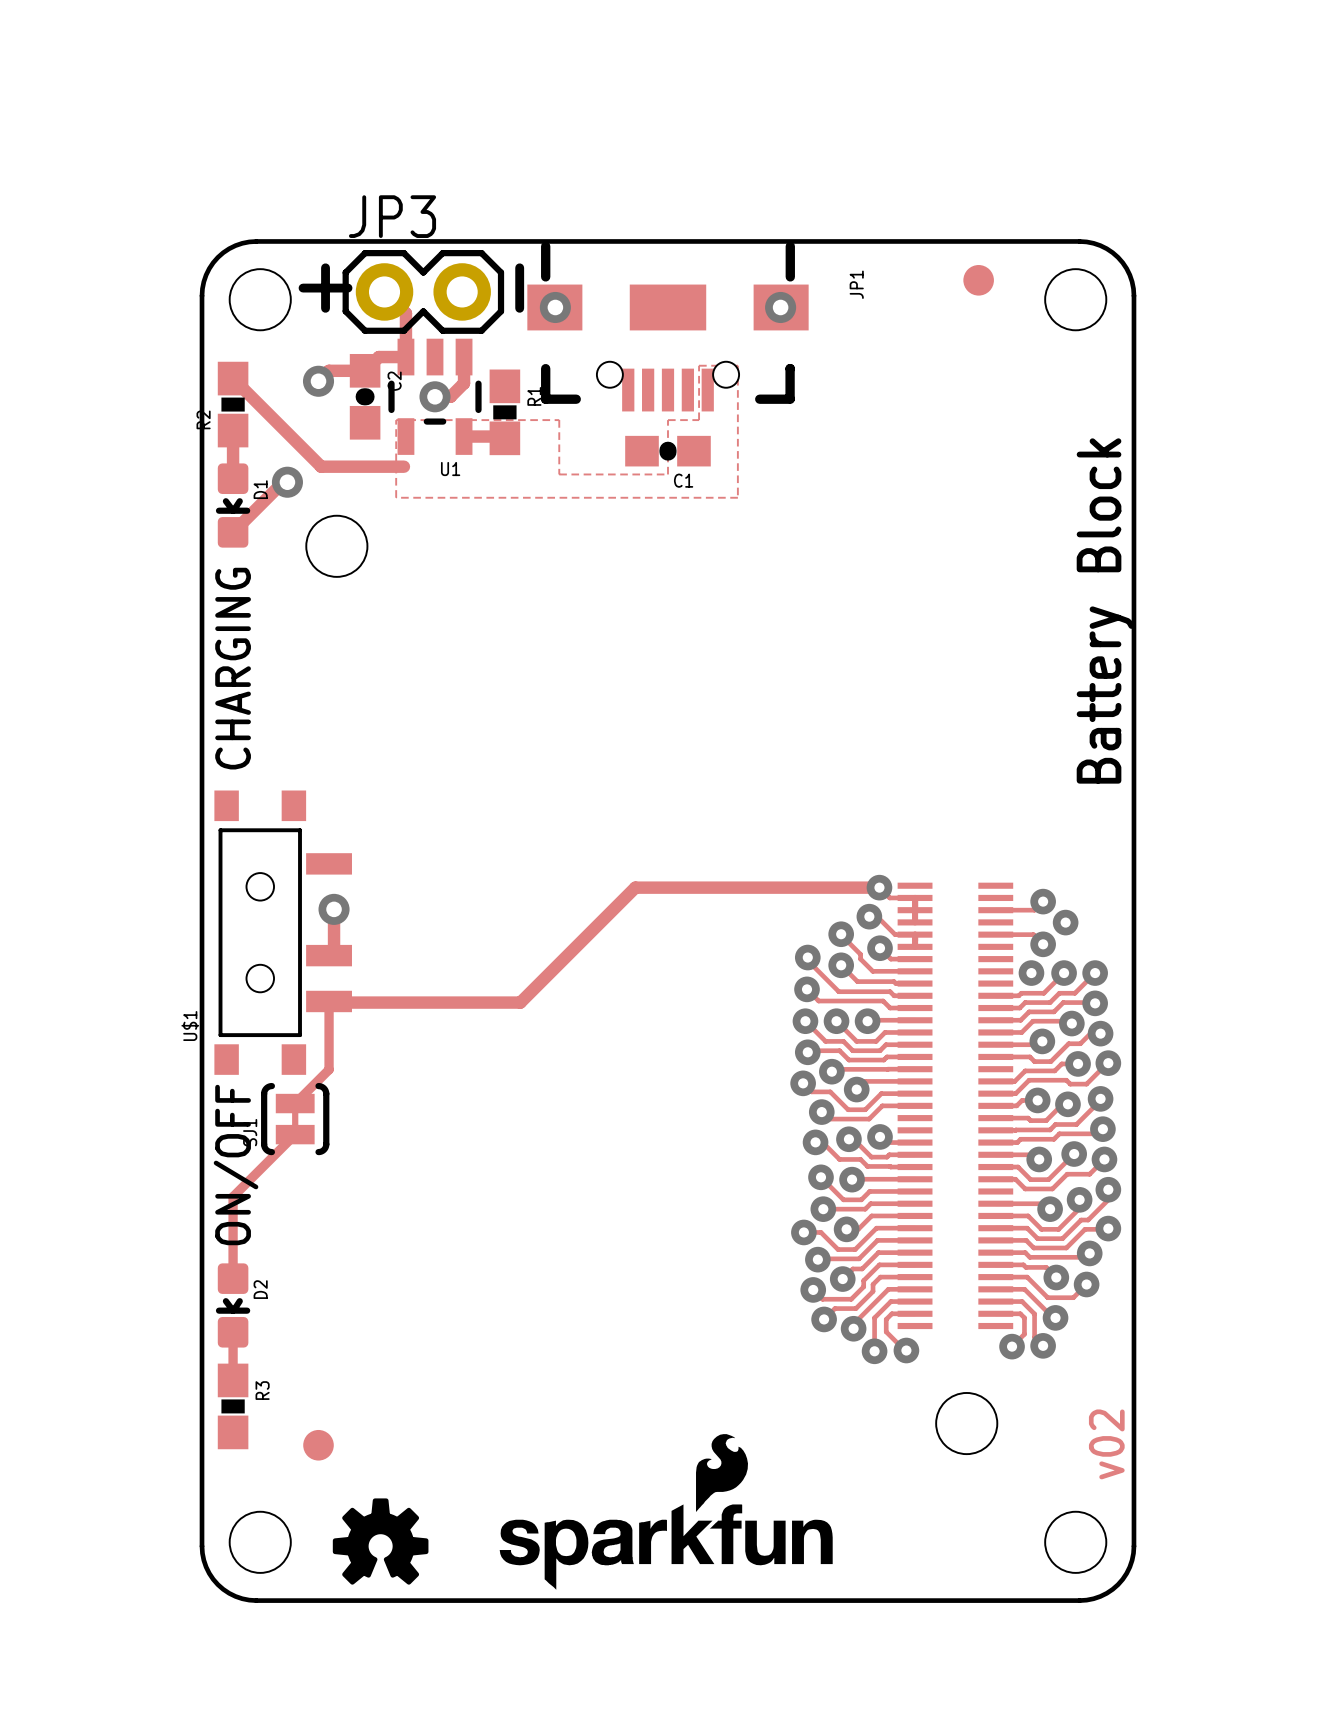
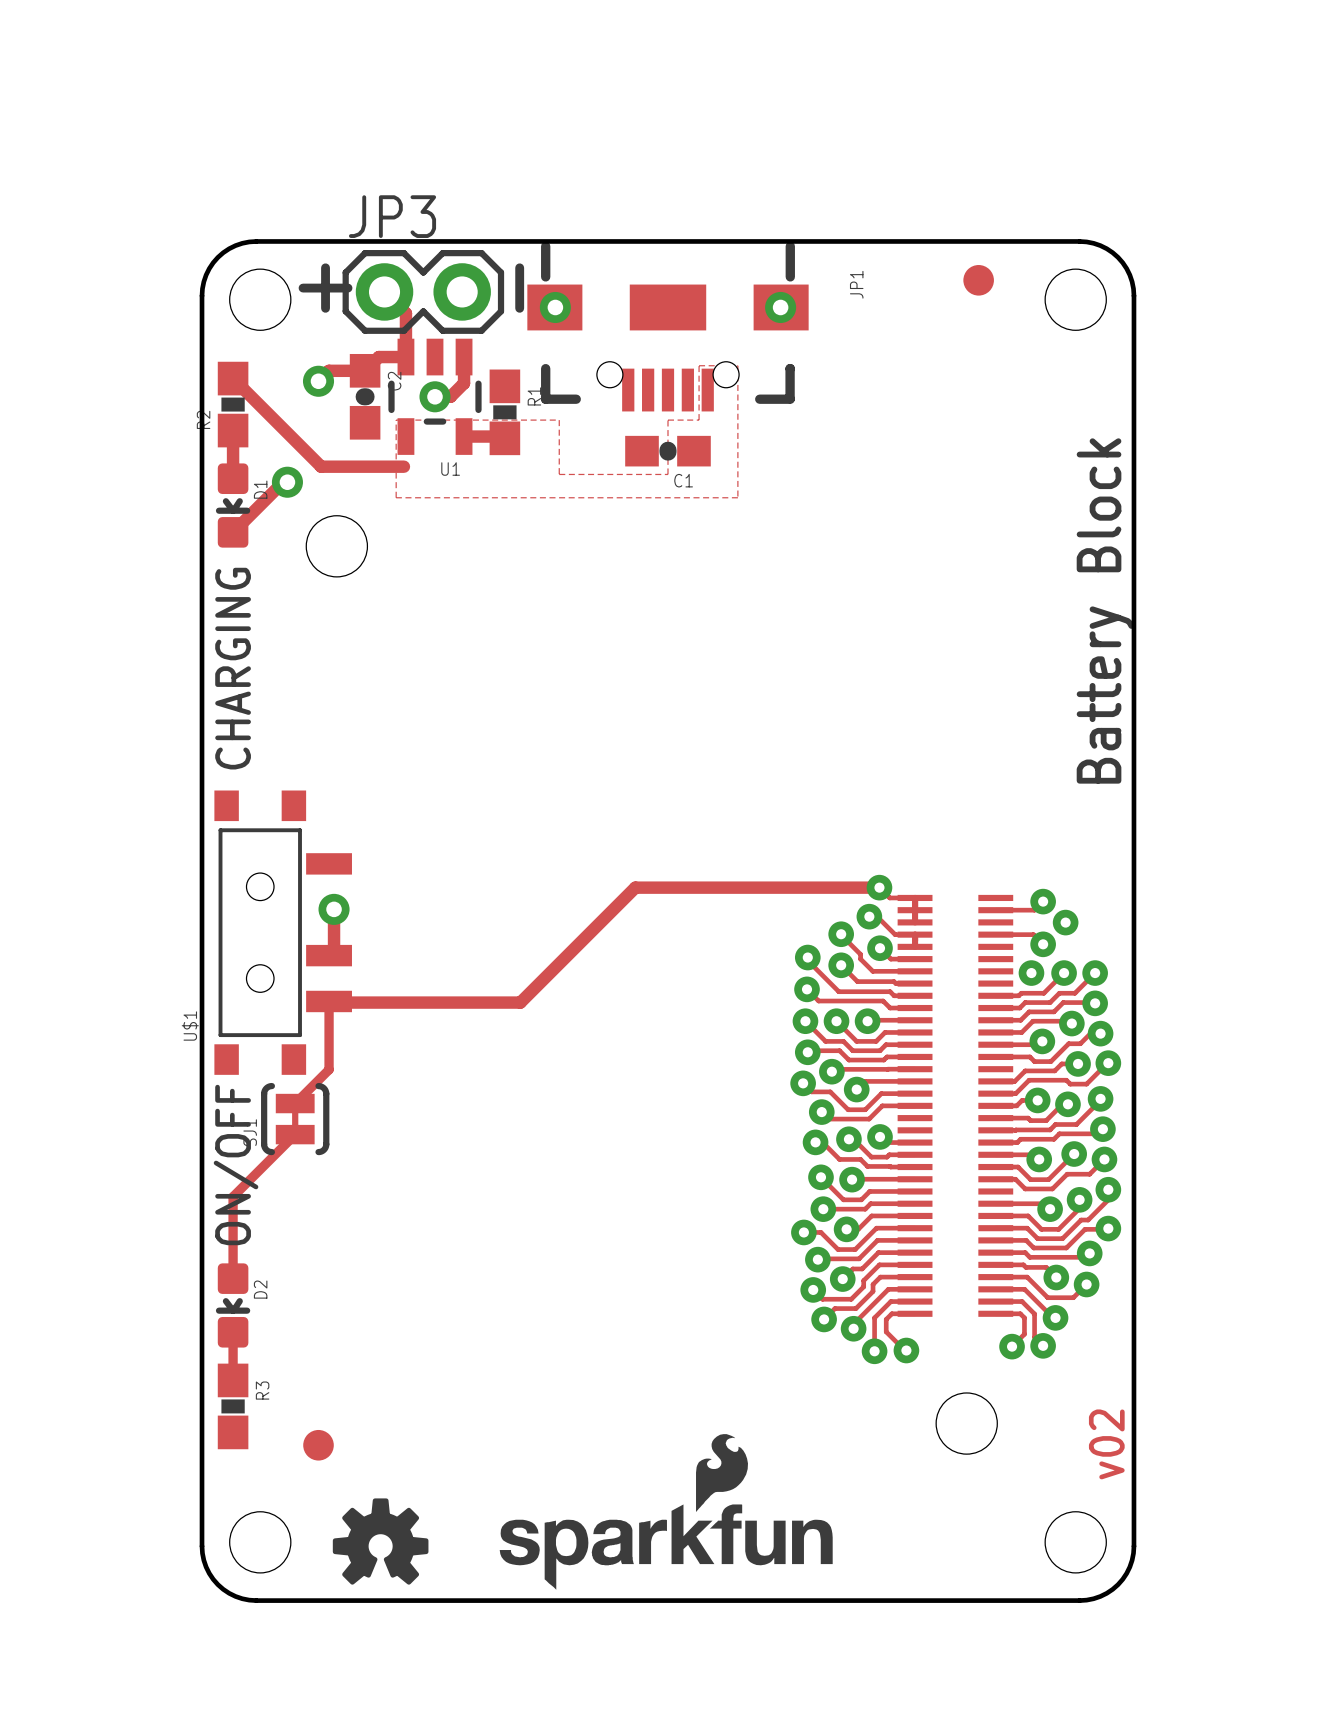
part footprint: [897, 882, 1014, 1330] -> [897, 894, 1014, 1317]

